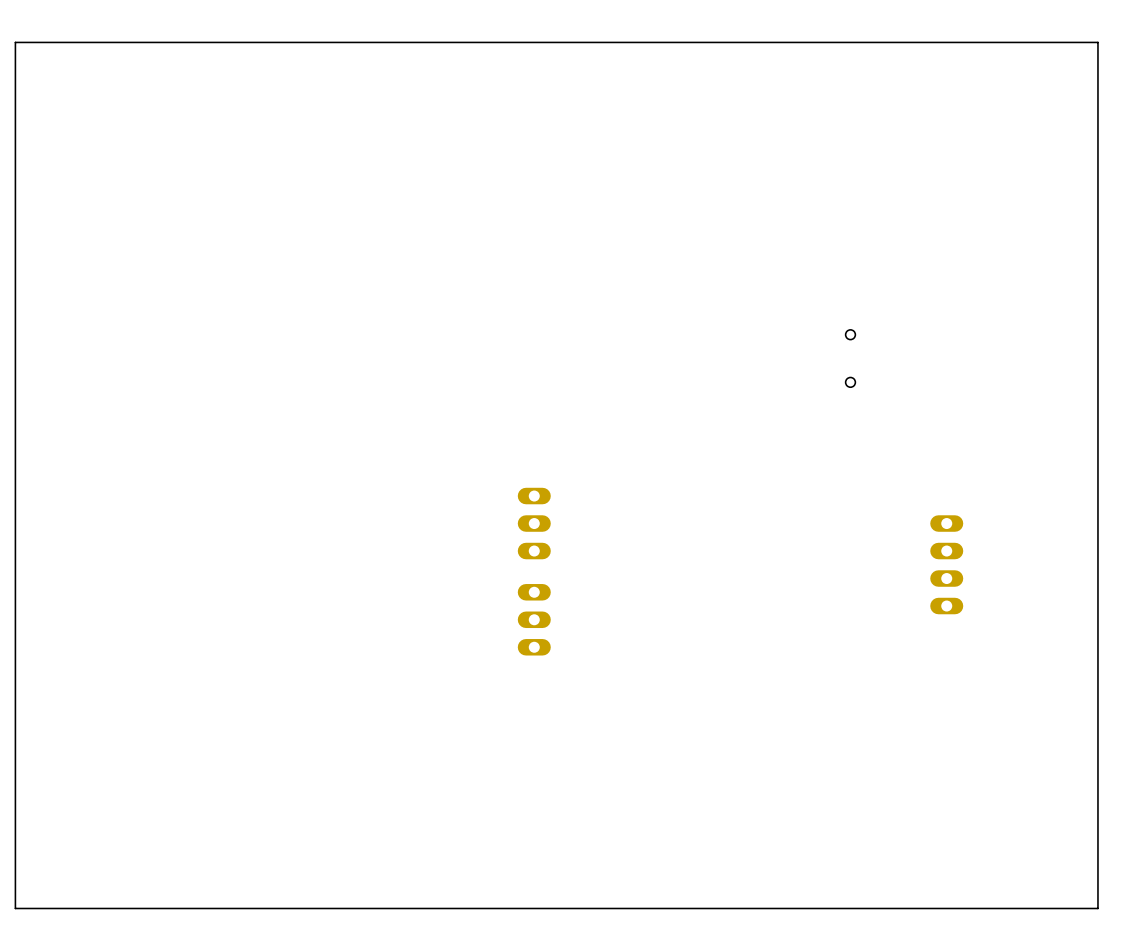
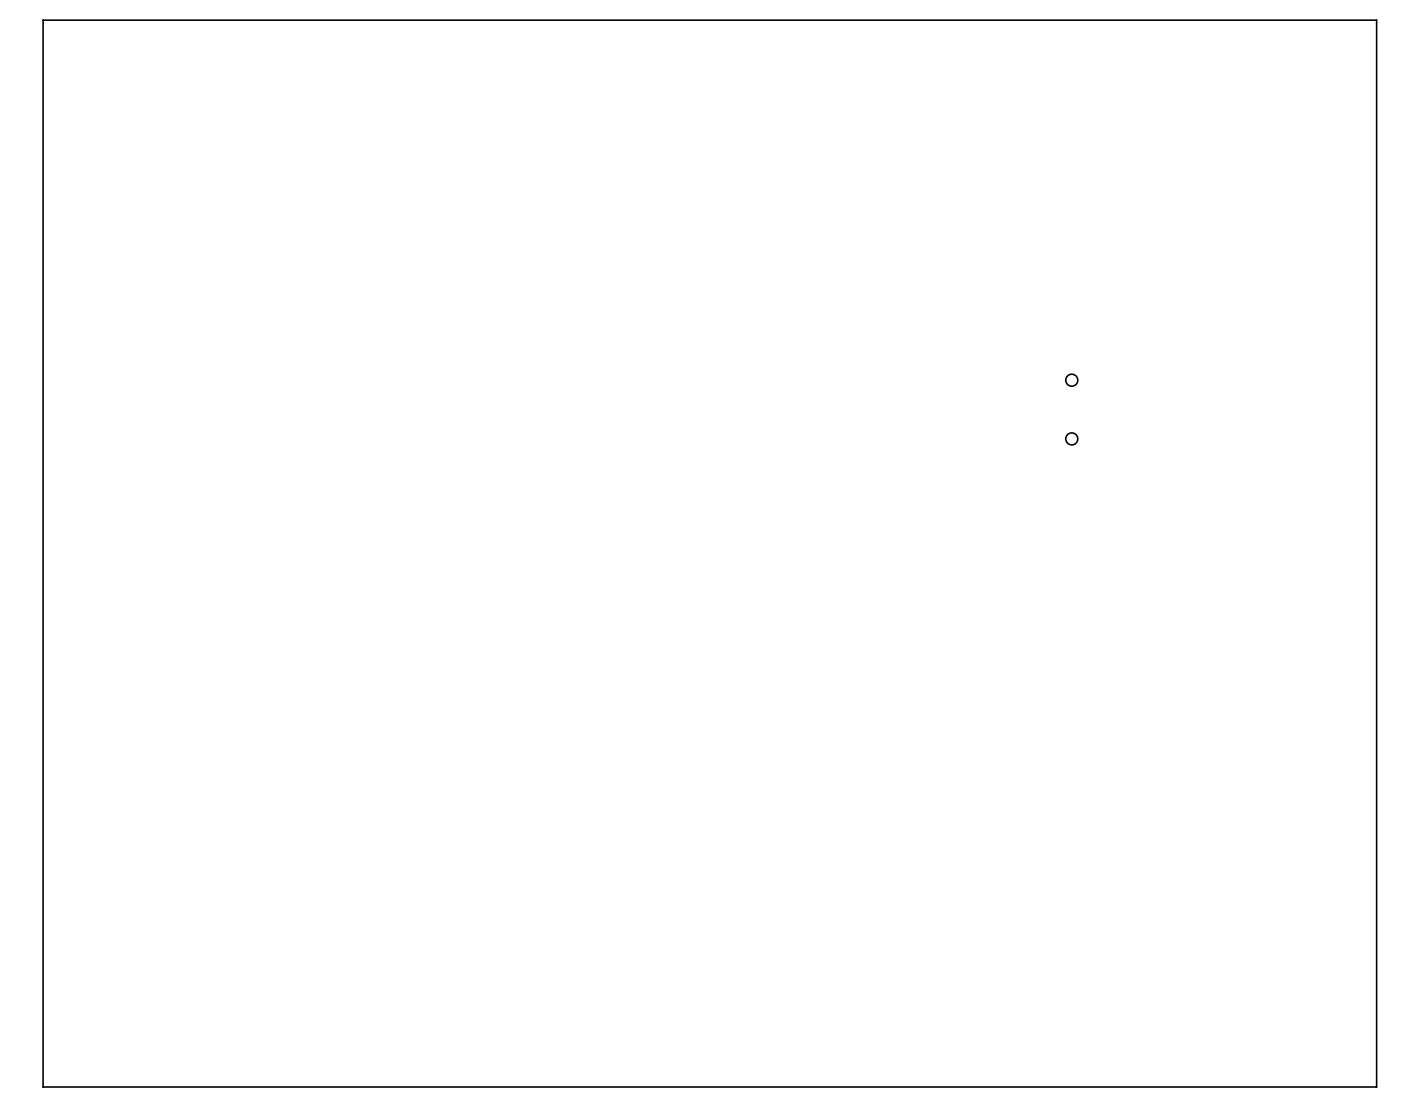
part: (534, 523) -> none
part: (946, 564) -> none
part: (534, 619) -> none

